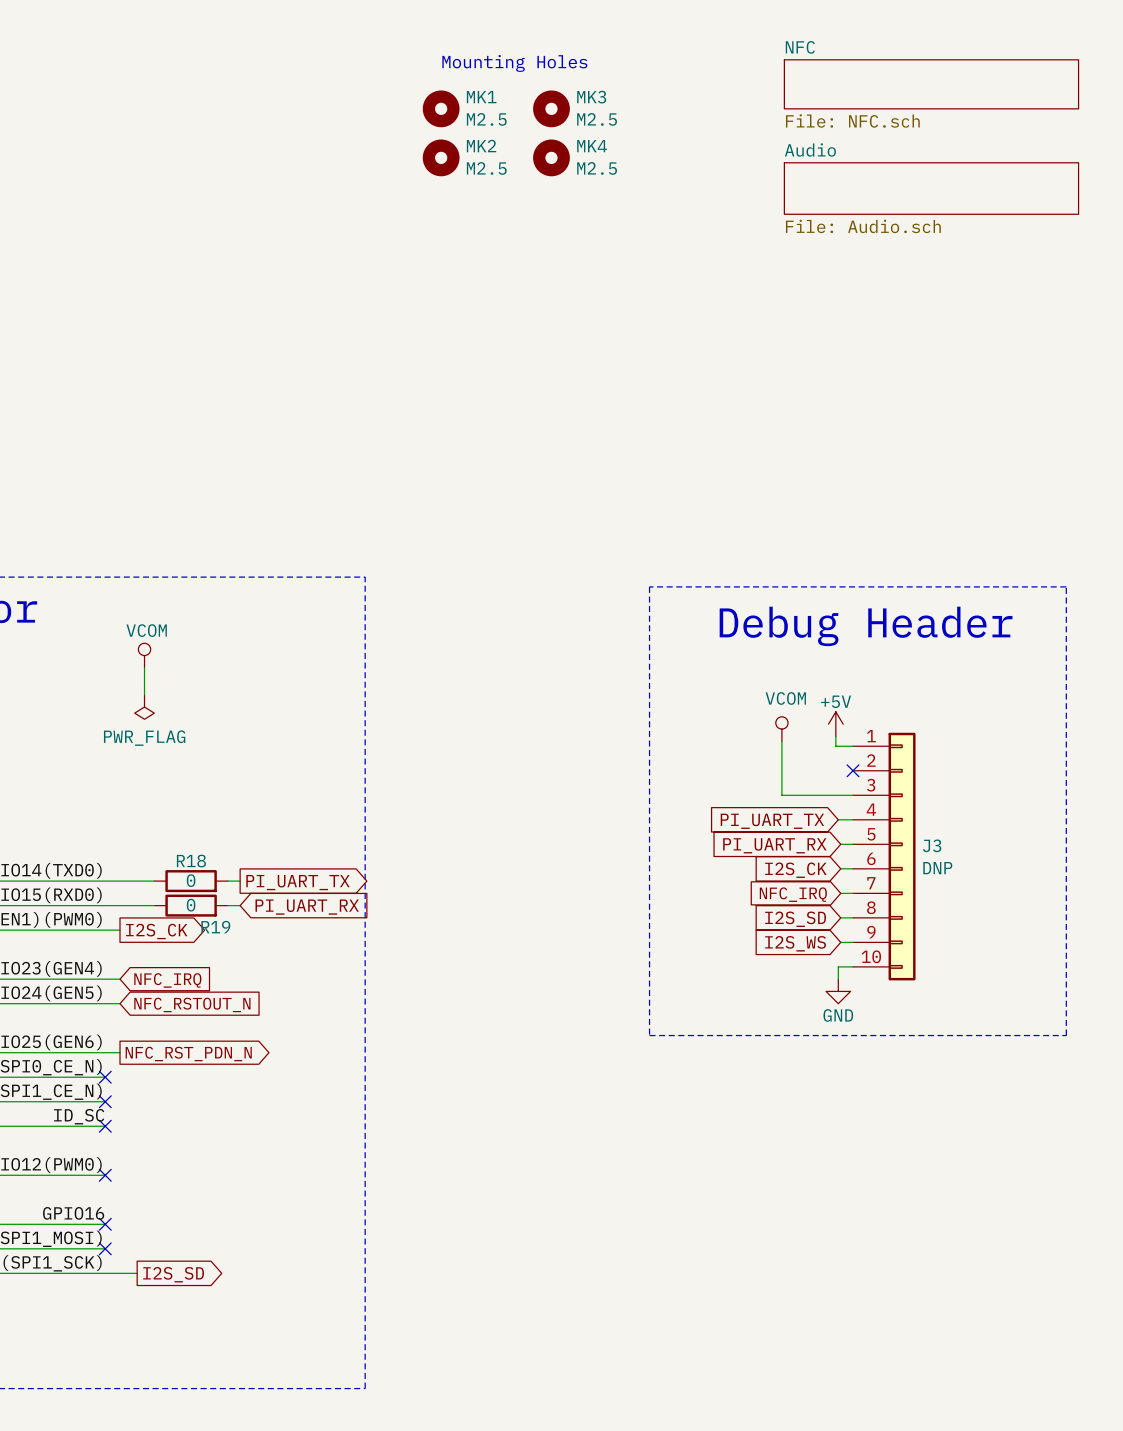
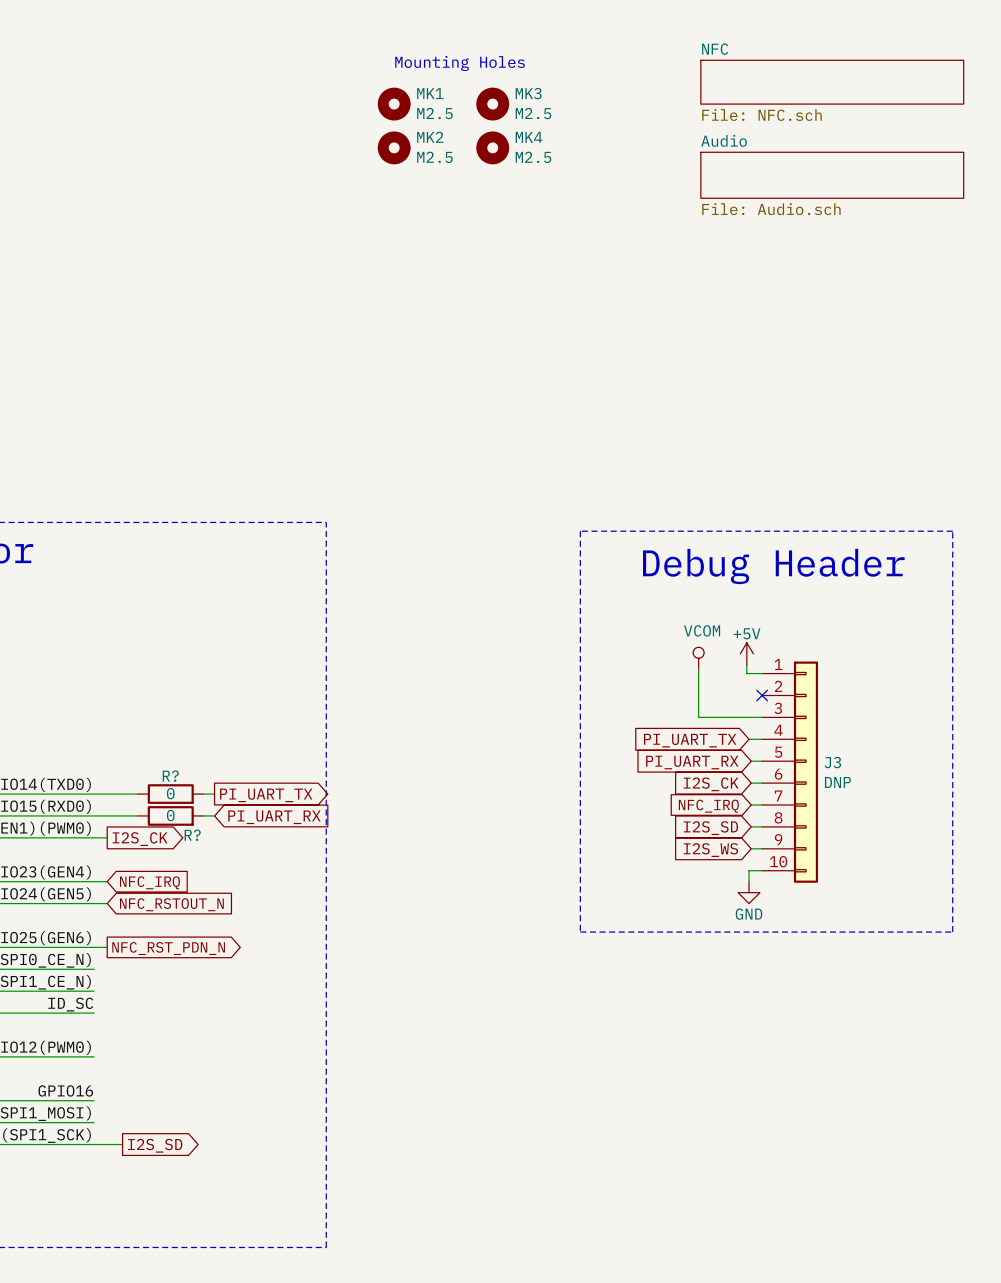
power symbol: VCOM (144, 655) -> none
wire: (144, 667) (144, 694) -> none
power symbol: PWR_FLAG (144, 707) -> none
R18 name: R18 (191, 861) -> R? (170, 776)
R19 name: R19 (215, 927) -> R? (192, 835)
no-connect mark: (105, 1077) -> none
no-connect mark: (105, 1101) -> none
no-connect mark: (105, 1126) -> none
no-connect mark: (105, 1175) -> none
no-connect mark: (105, 1224) -> none
no-connect mark: (105, 1248) -> none

